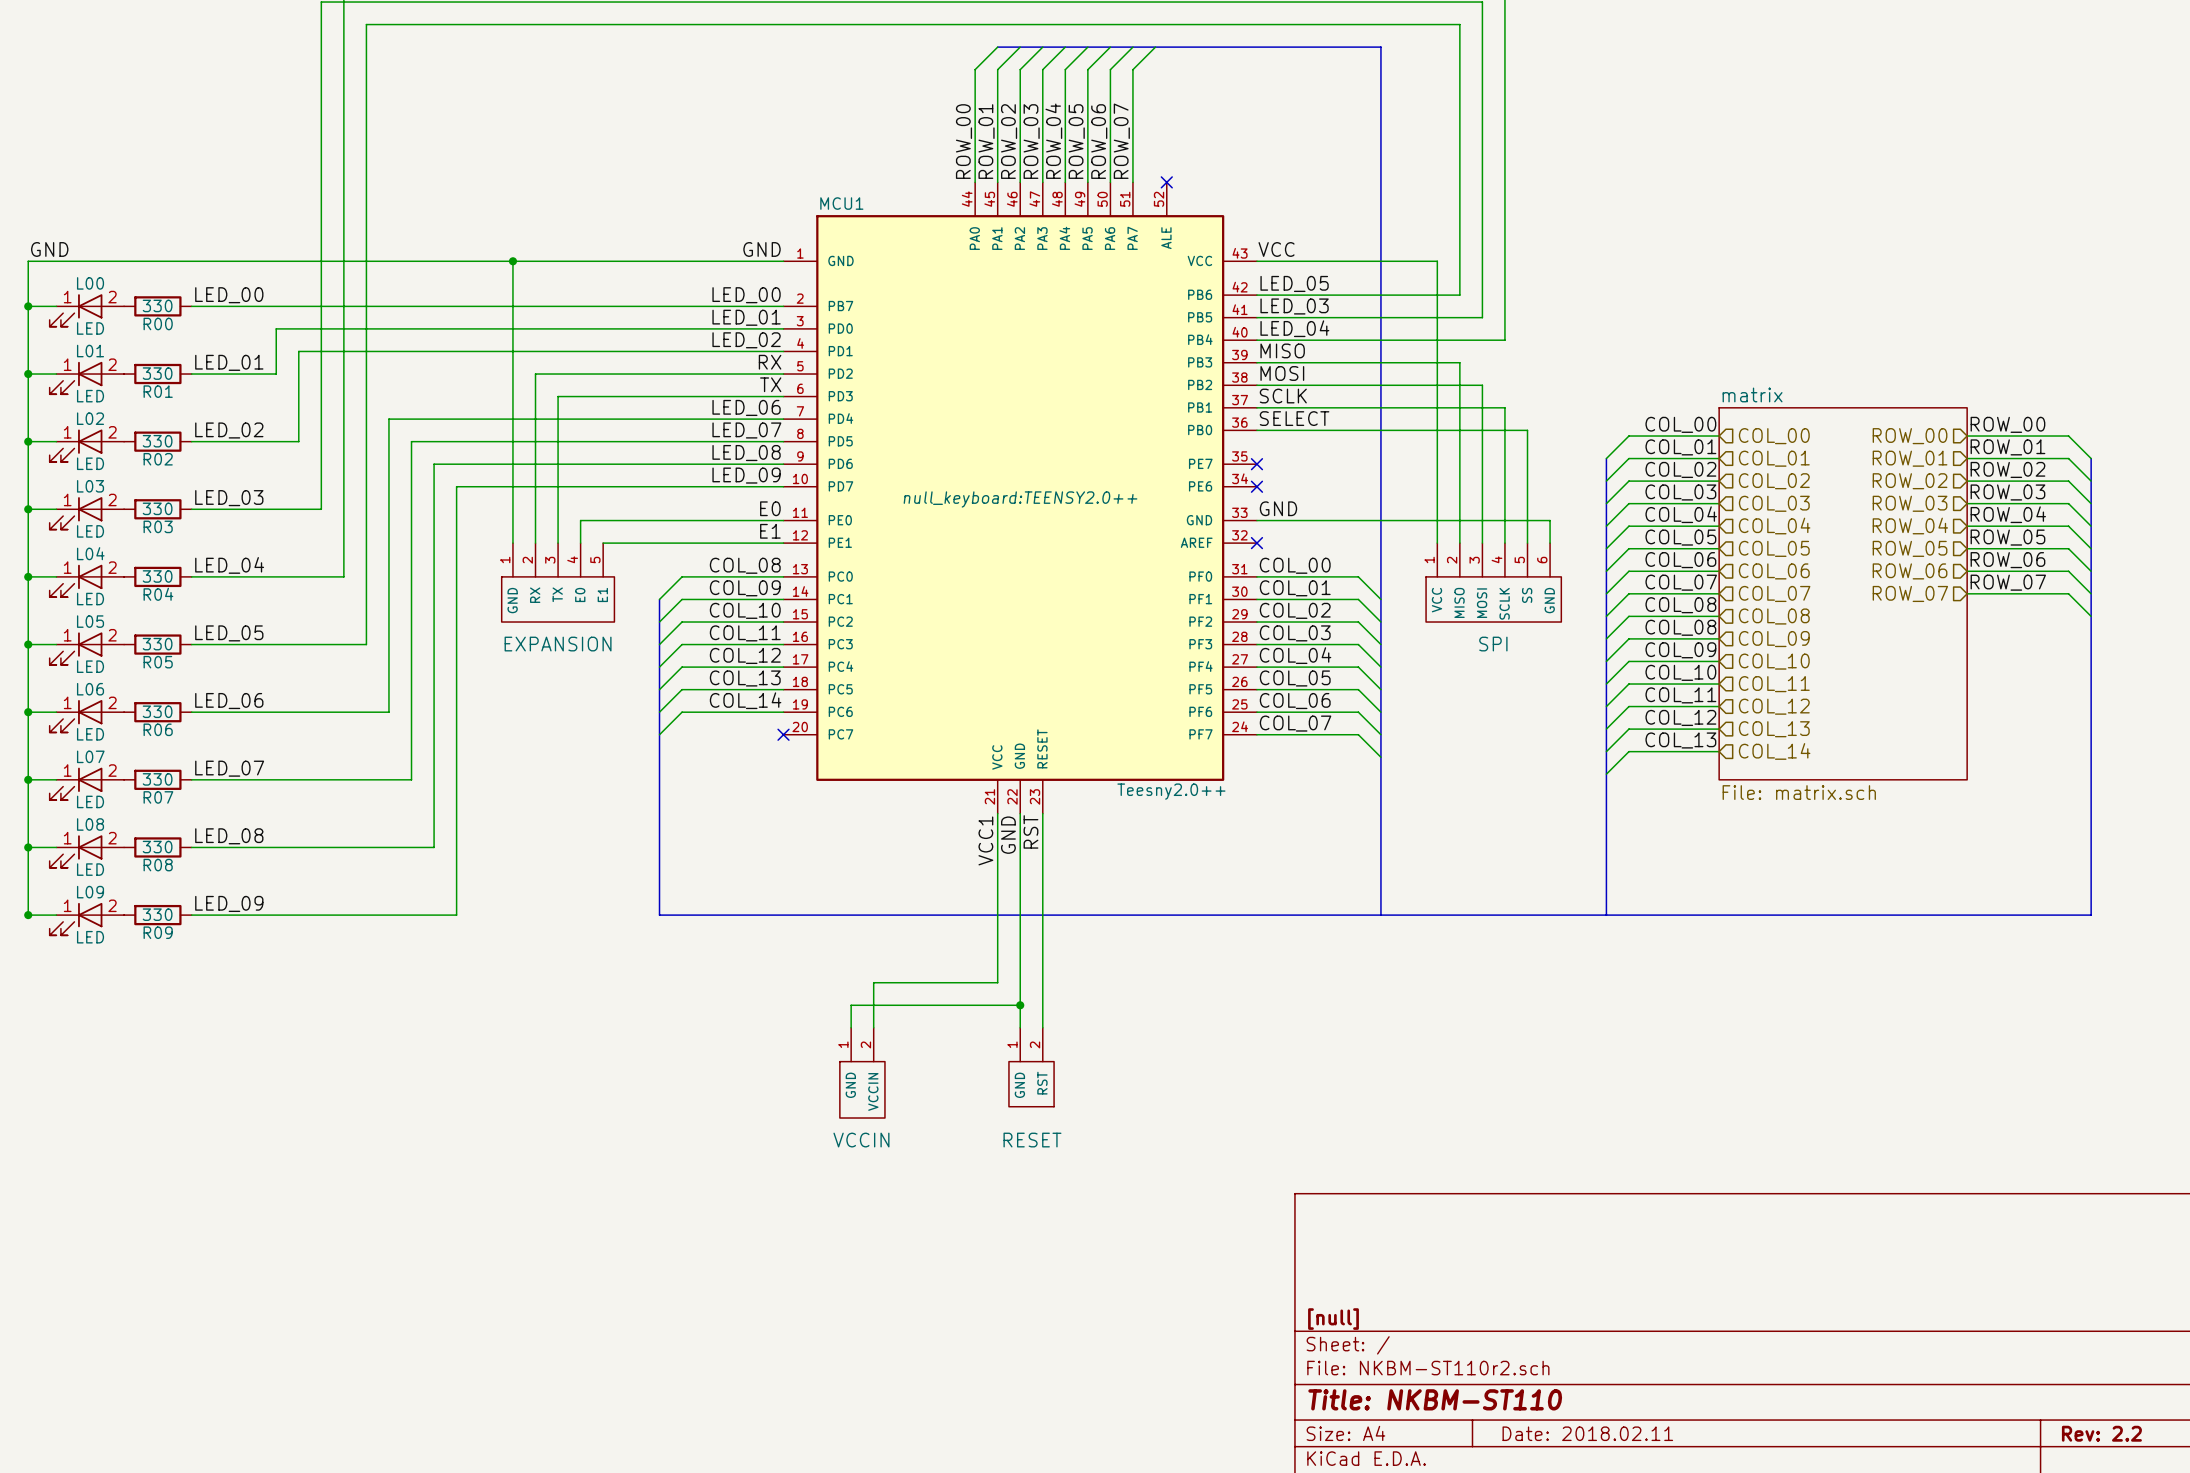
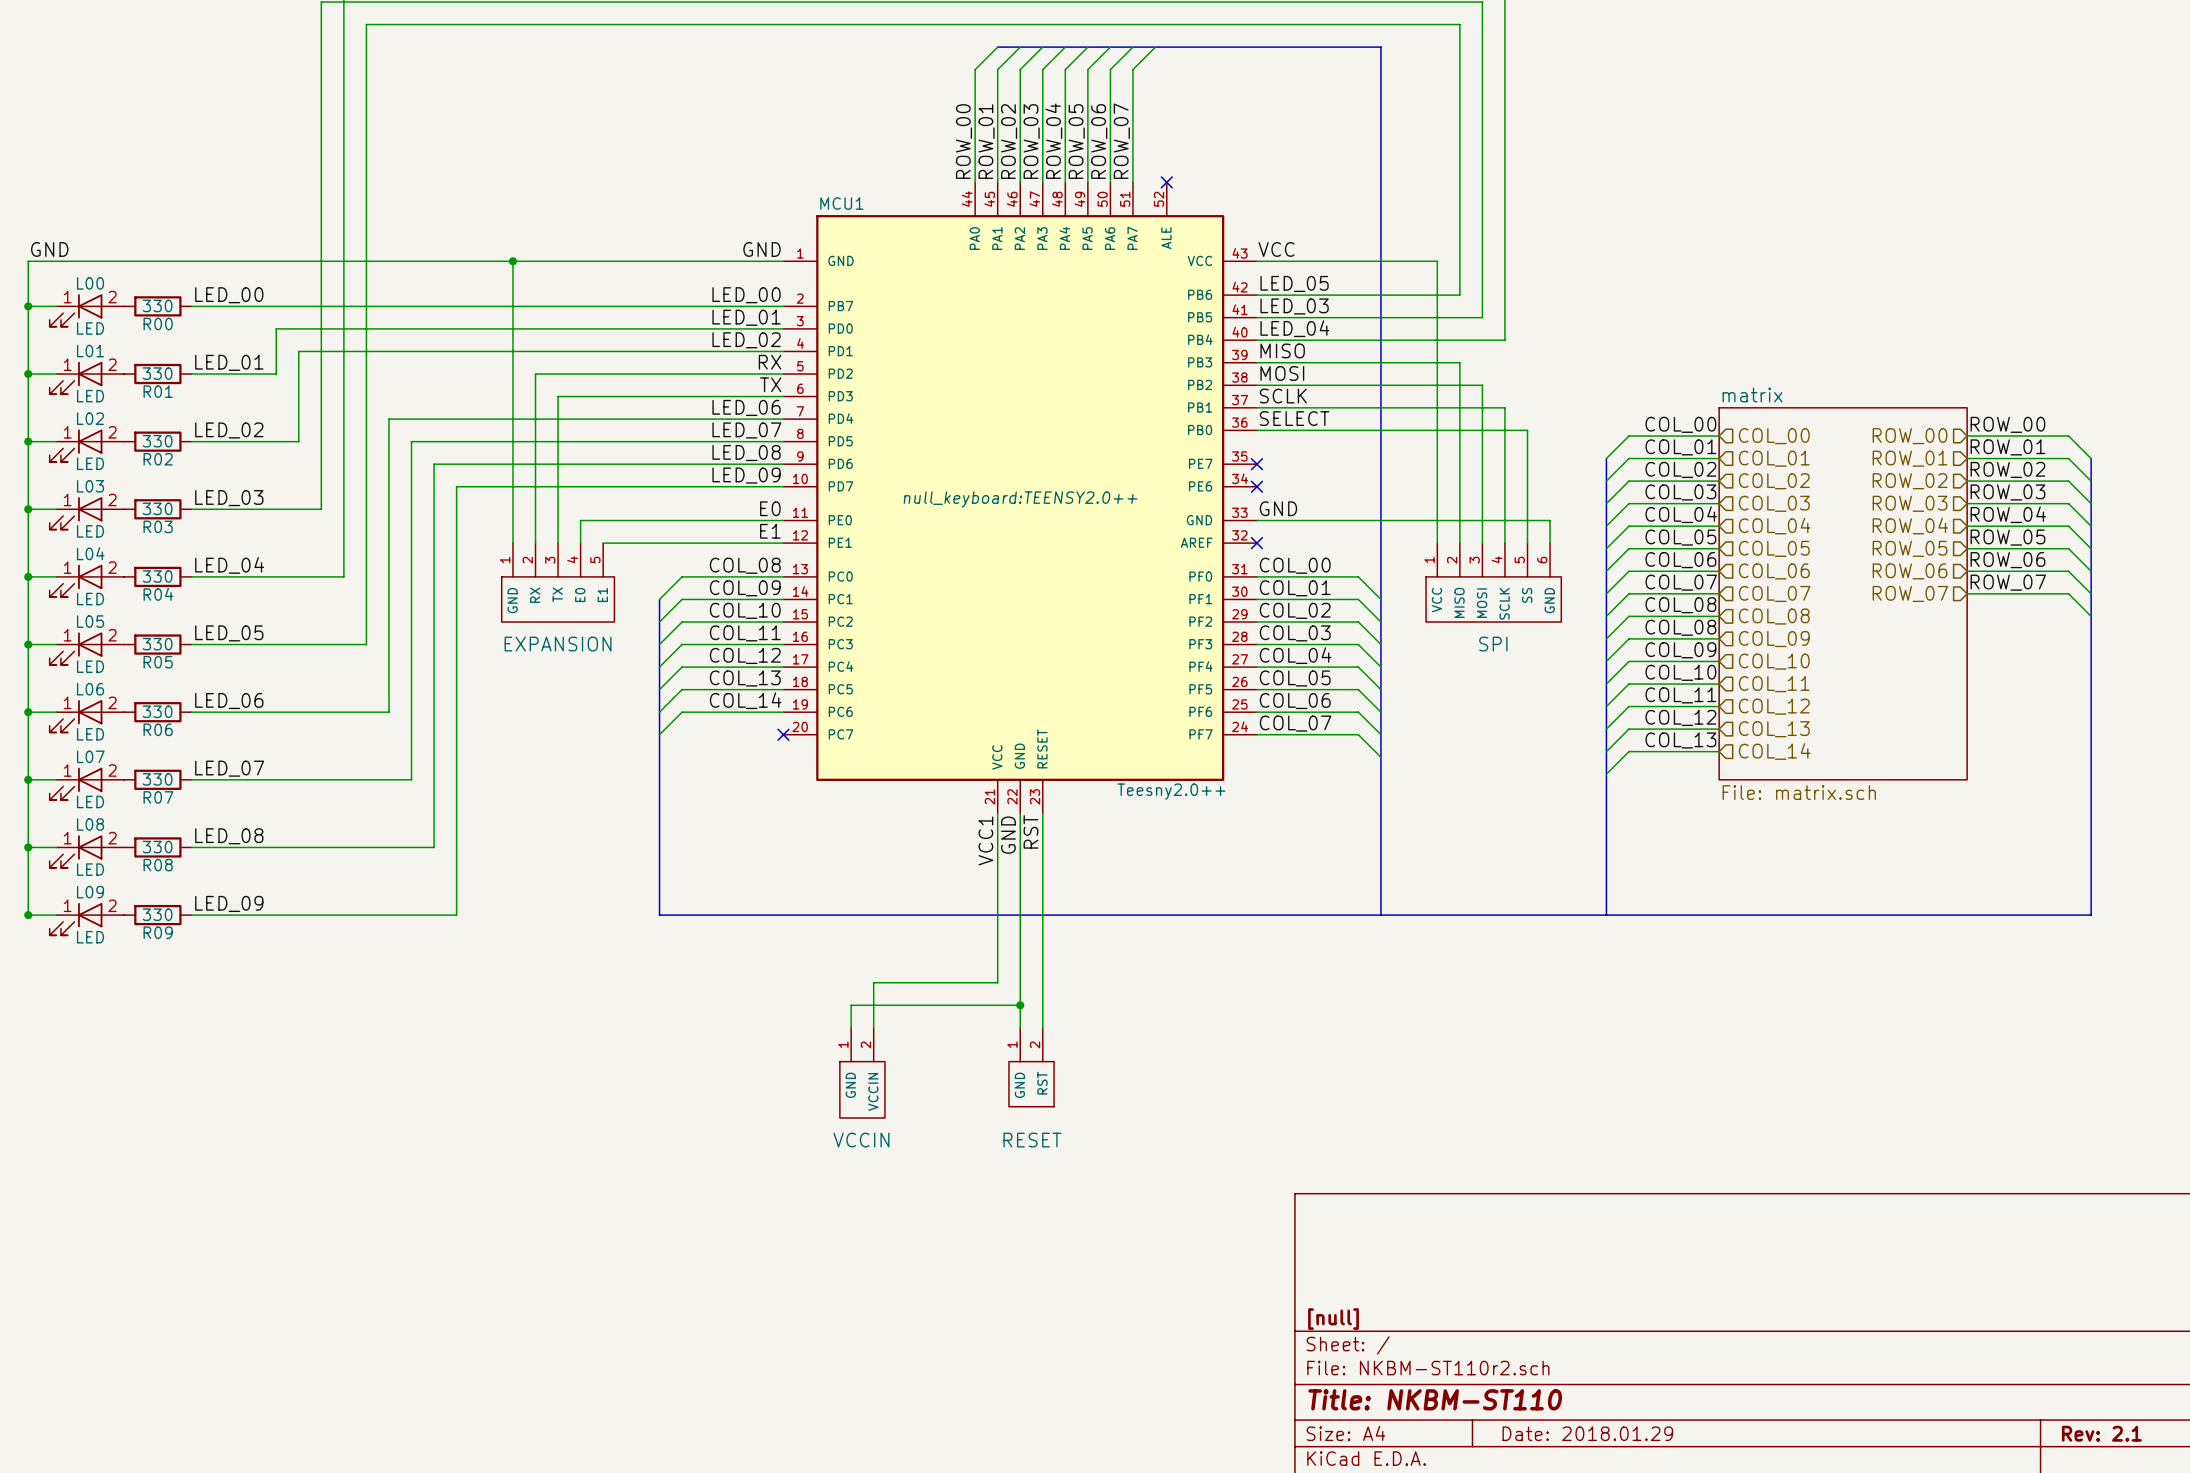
title block: Date: 2018.02.11 (1587, 1433) -> Date: 2018.01.29 (1587, 1433)
title block: Rev: 2.2 (2101, 1433) -> Rev: 2.1 (2101, 1433)

